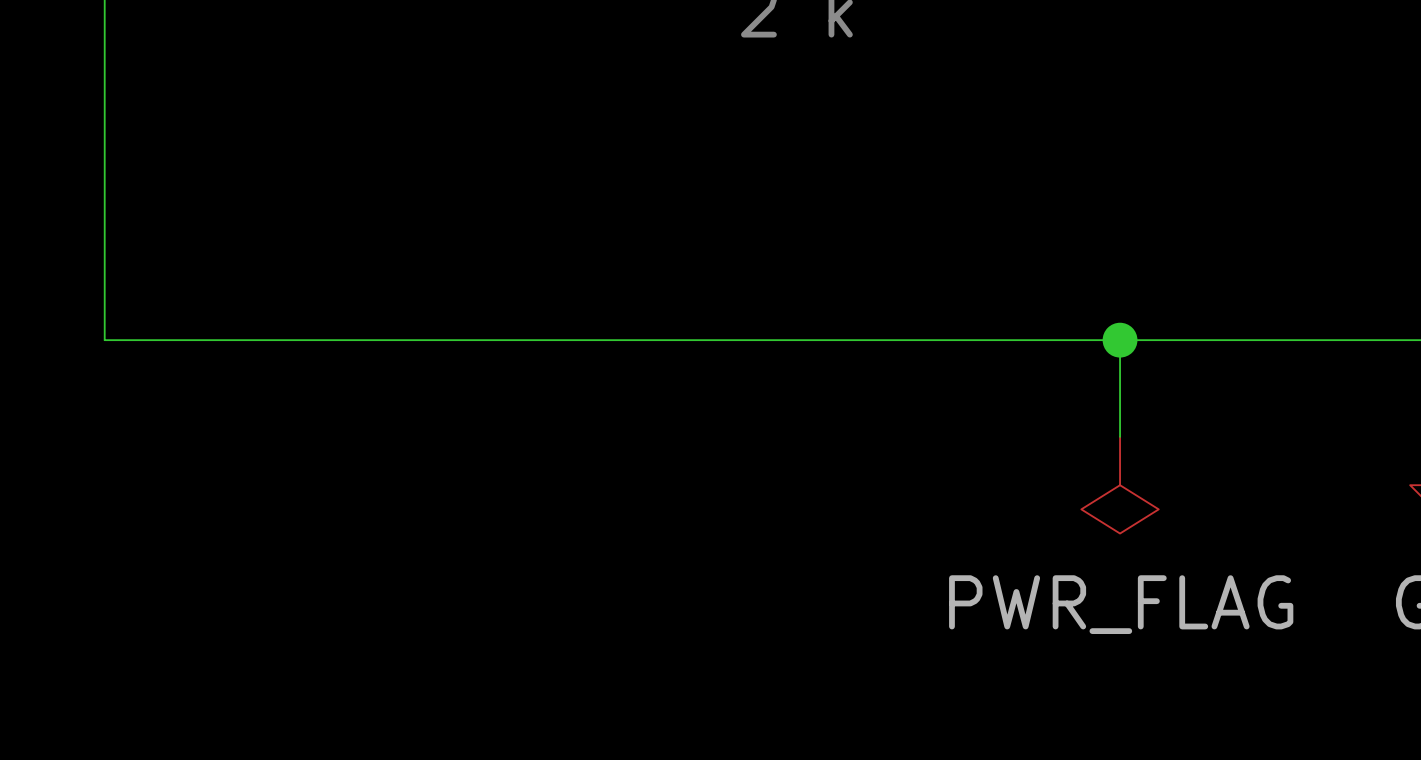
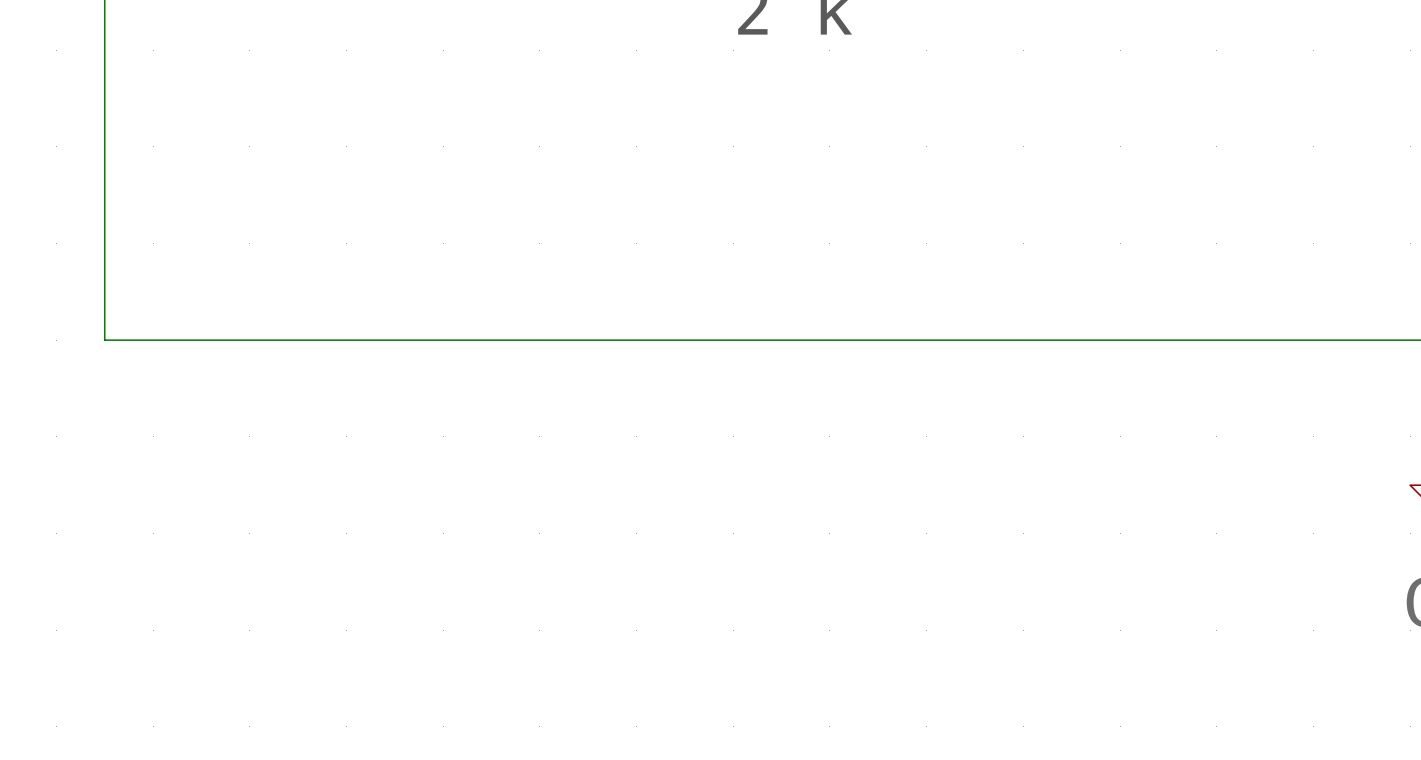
wire: (1120, 340) (1120, 436) -> none
junction: (1120, 340) -> none
power symbol: PWR_FLAG (1120, 485) -> none

